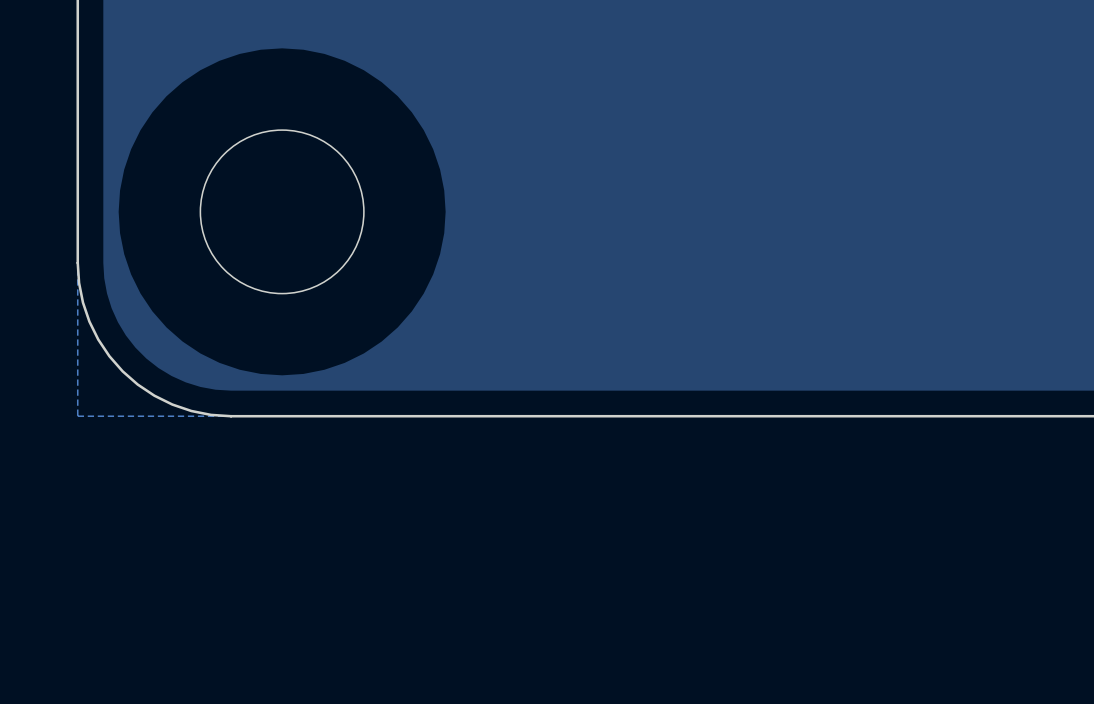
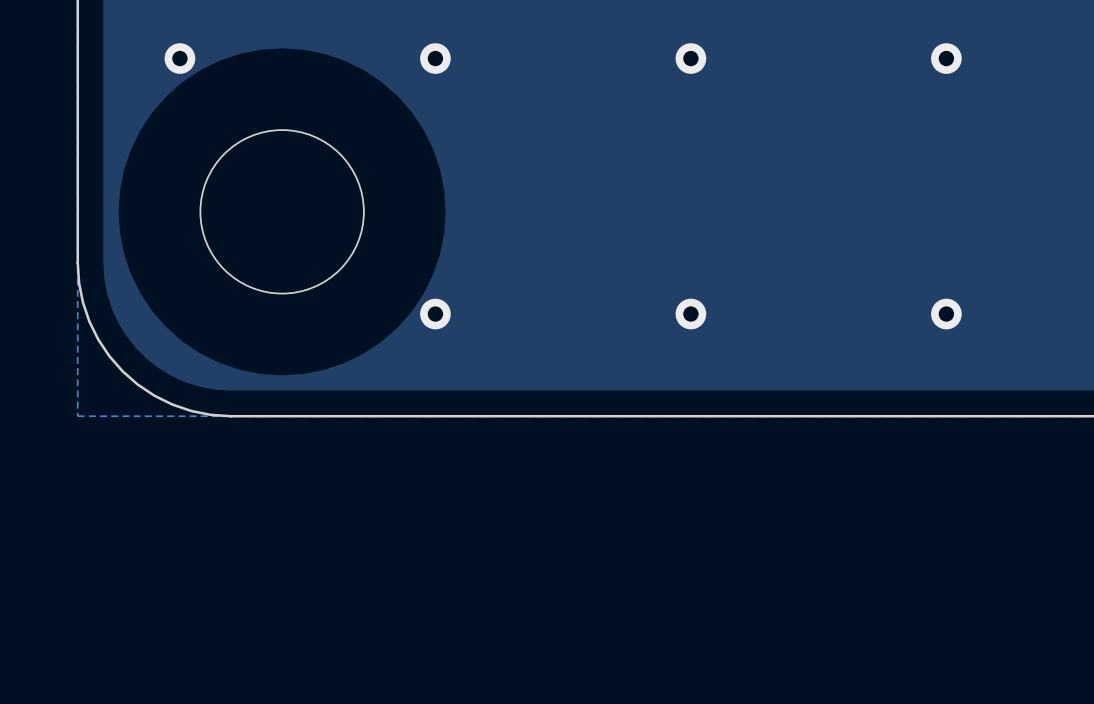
via: none -> (179, 58)
via: none -> (435, 58)
via: none -> (690, 58)
via: none -> (946, 58)
via: none -> (435, 314)
via: none -> (690, 314)
via: none -> (946, 314)

